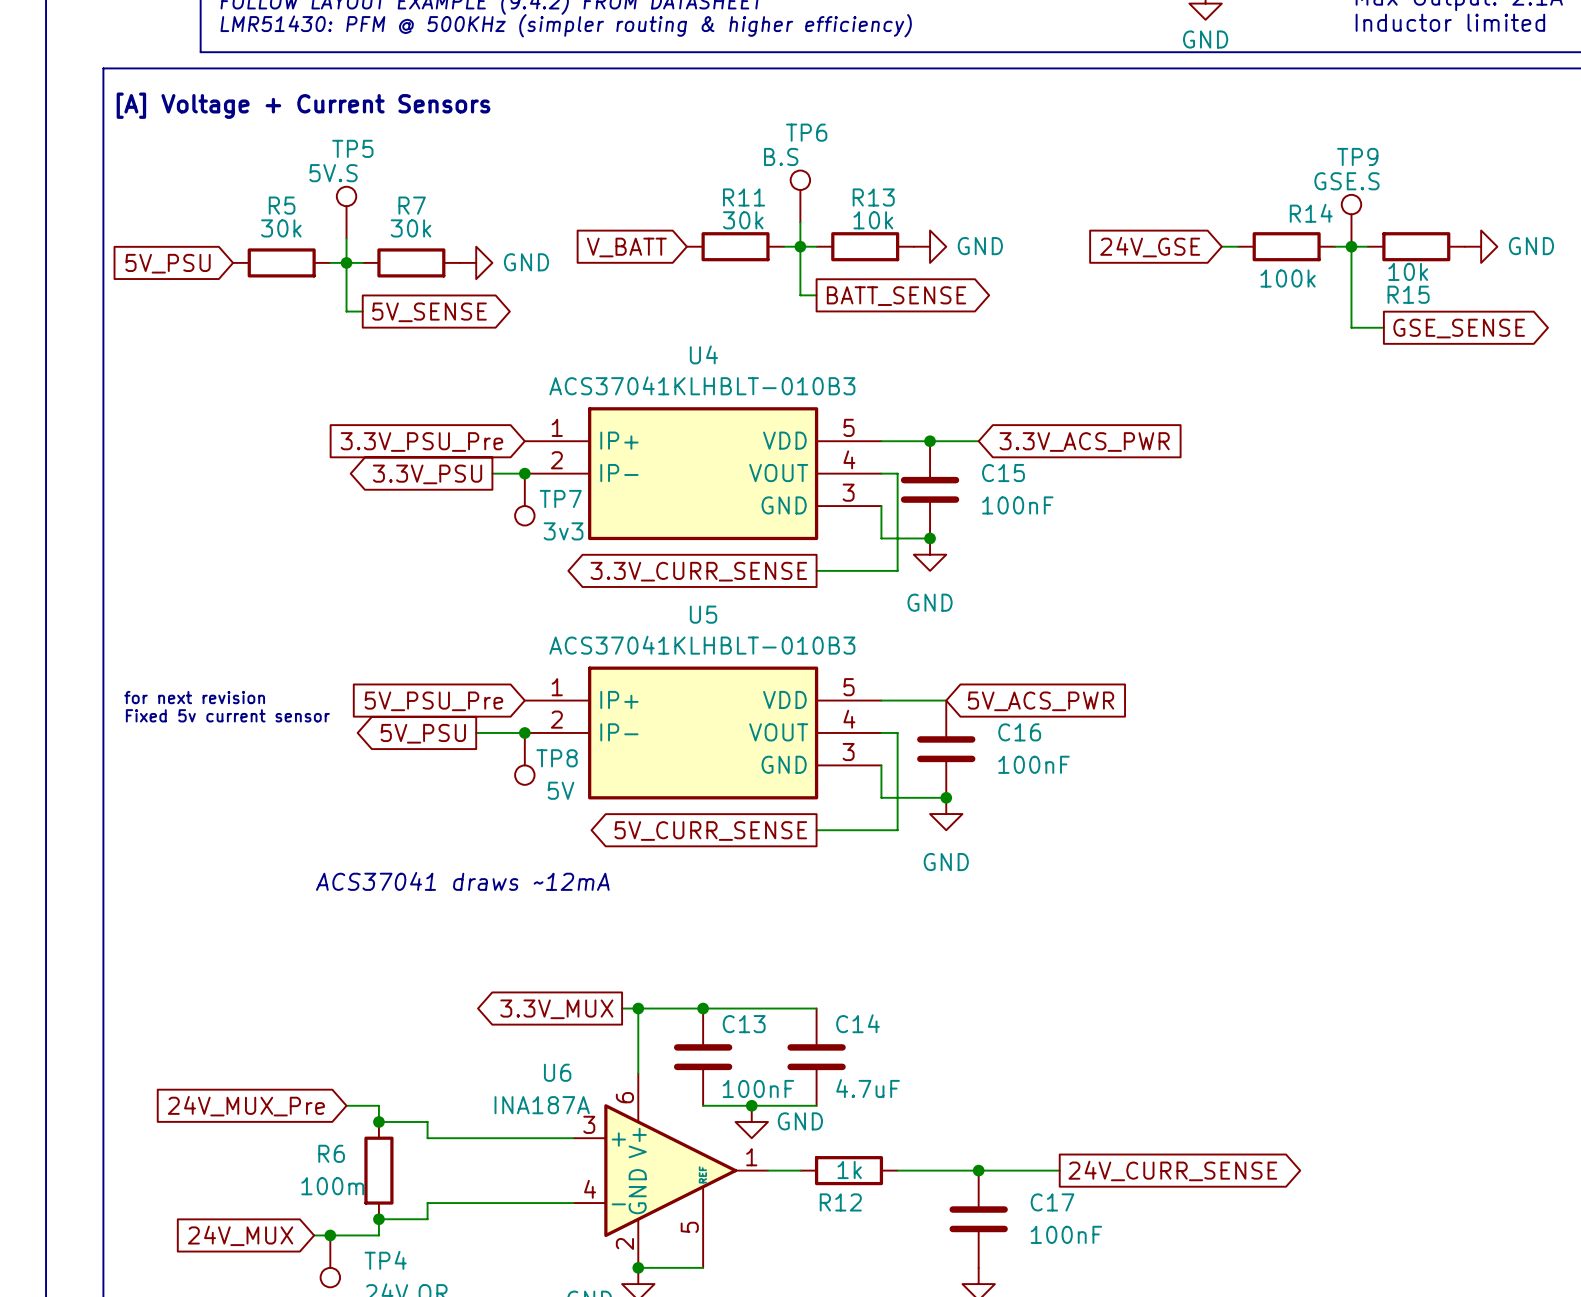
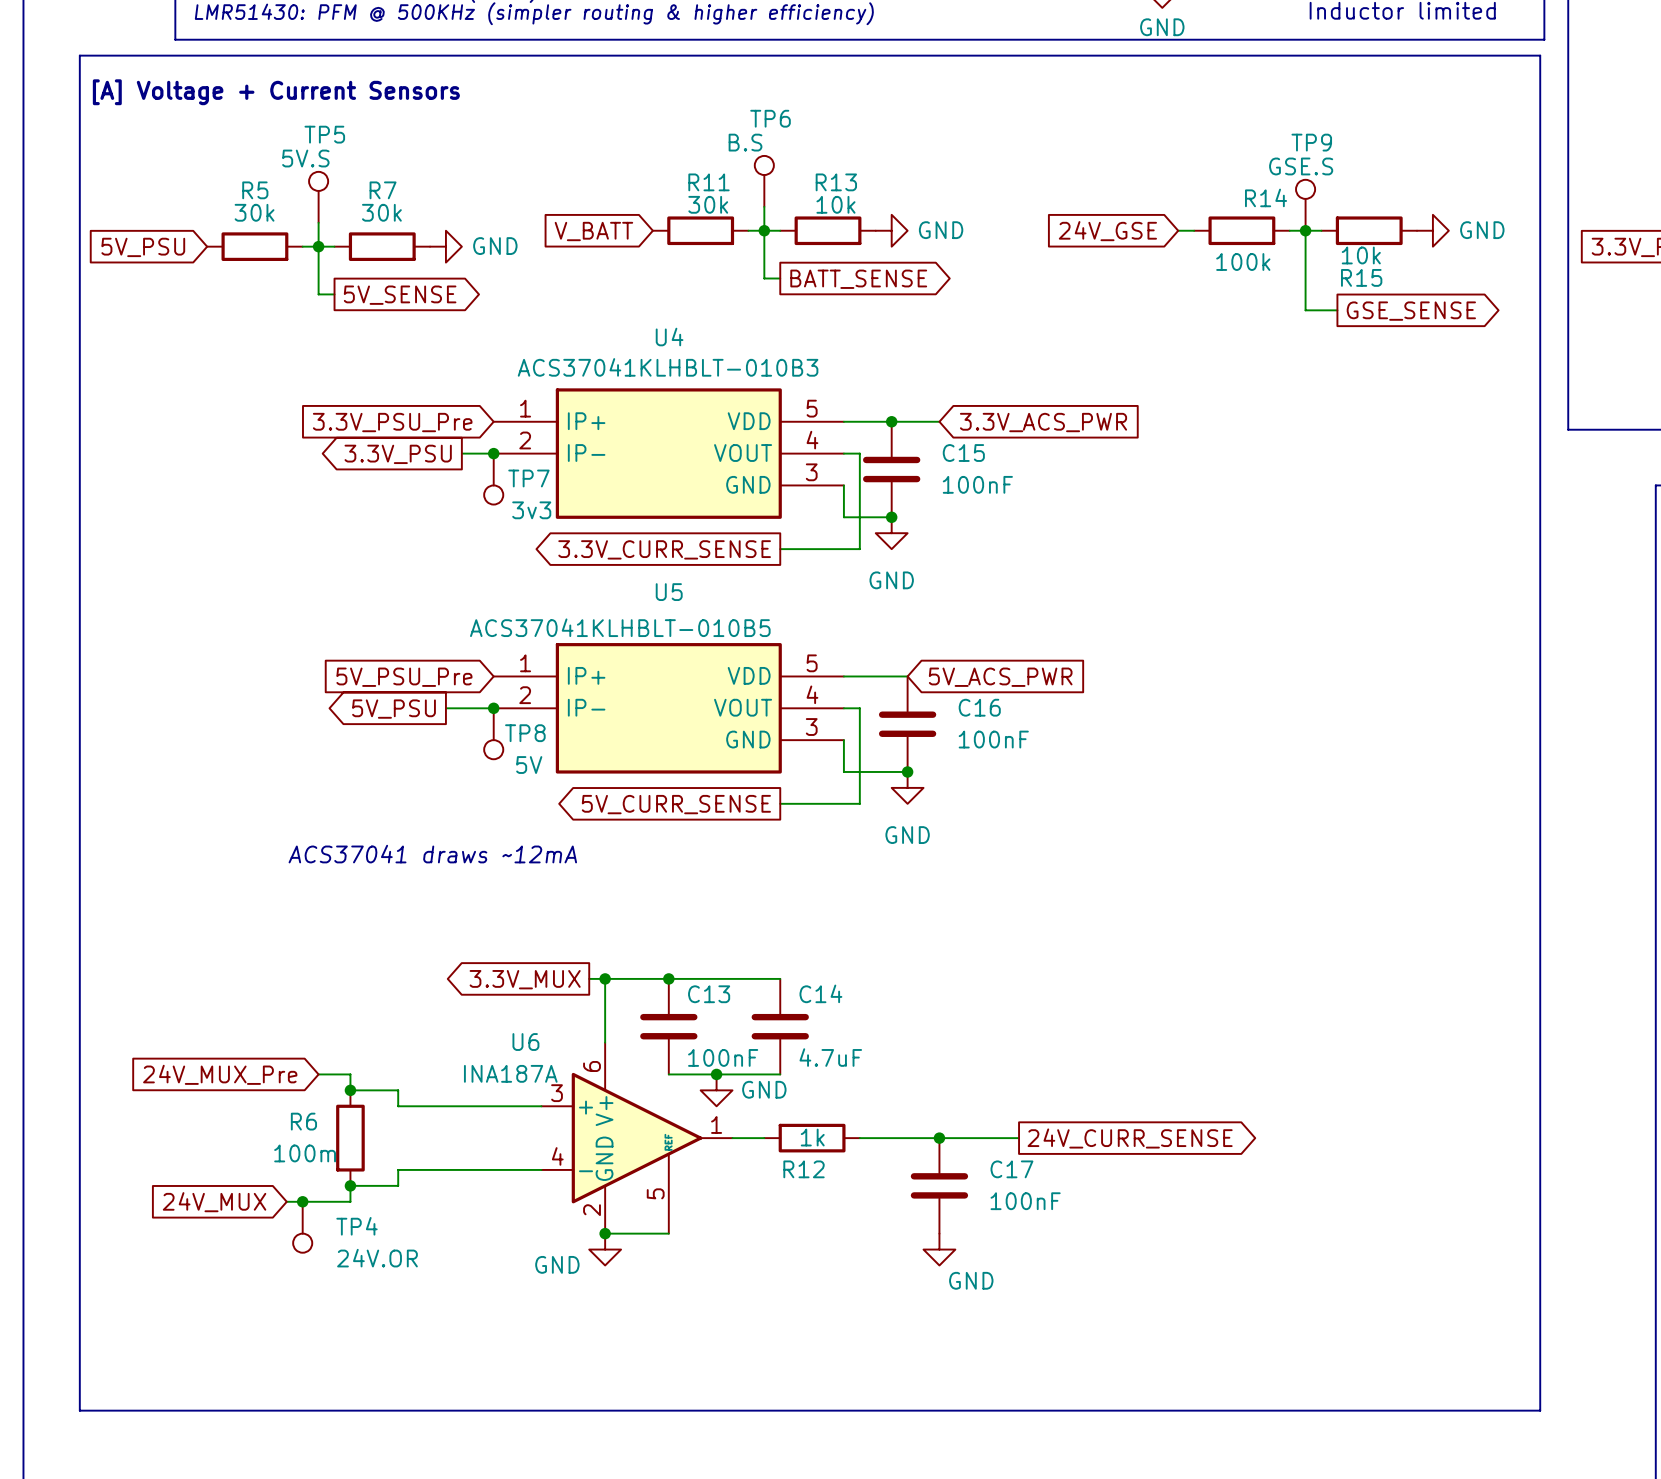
U5 value: ACS37041KLHBLT-010B3 (702, 645) -> ACS37041KLHBLT-010B5 (620, 627)
text: for next revision (194, 697) -> none
text: Fixed 5v current sensor (227, 715) -> none

